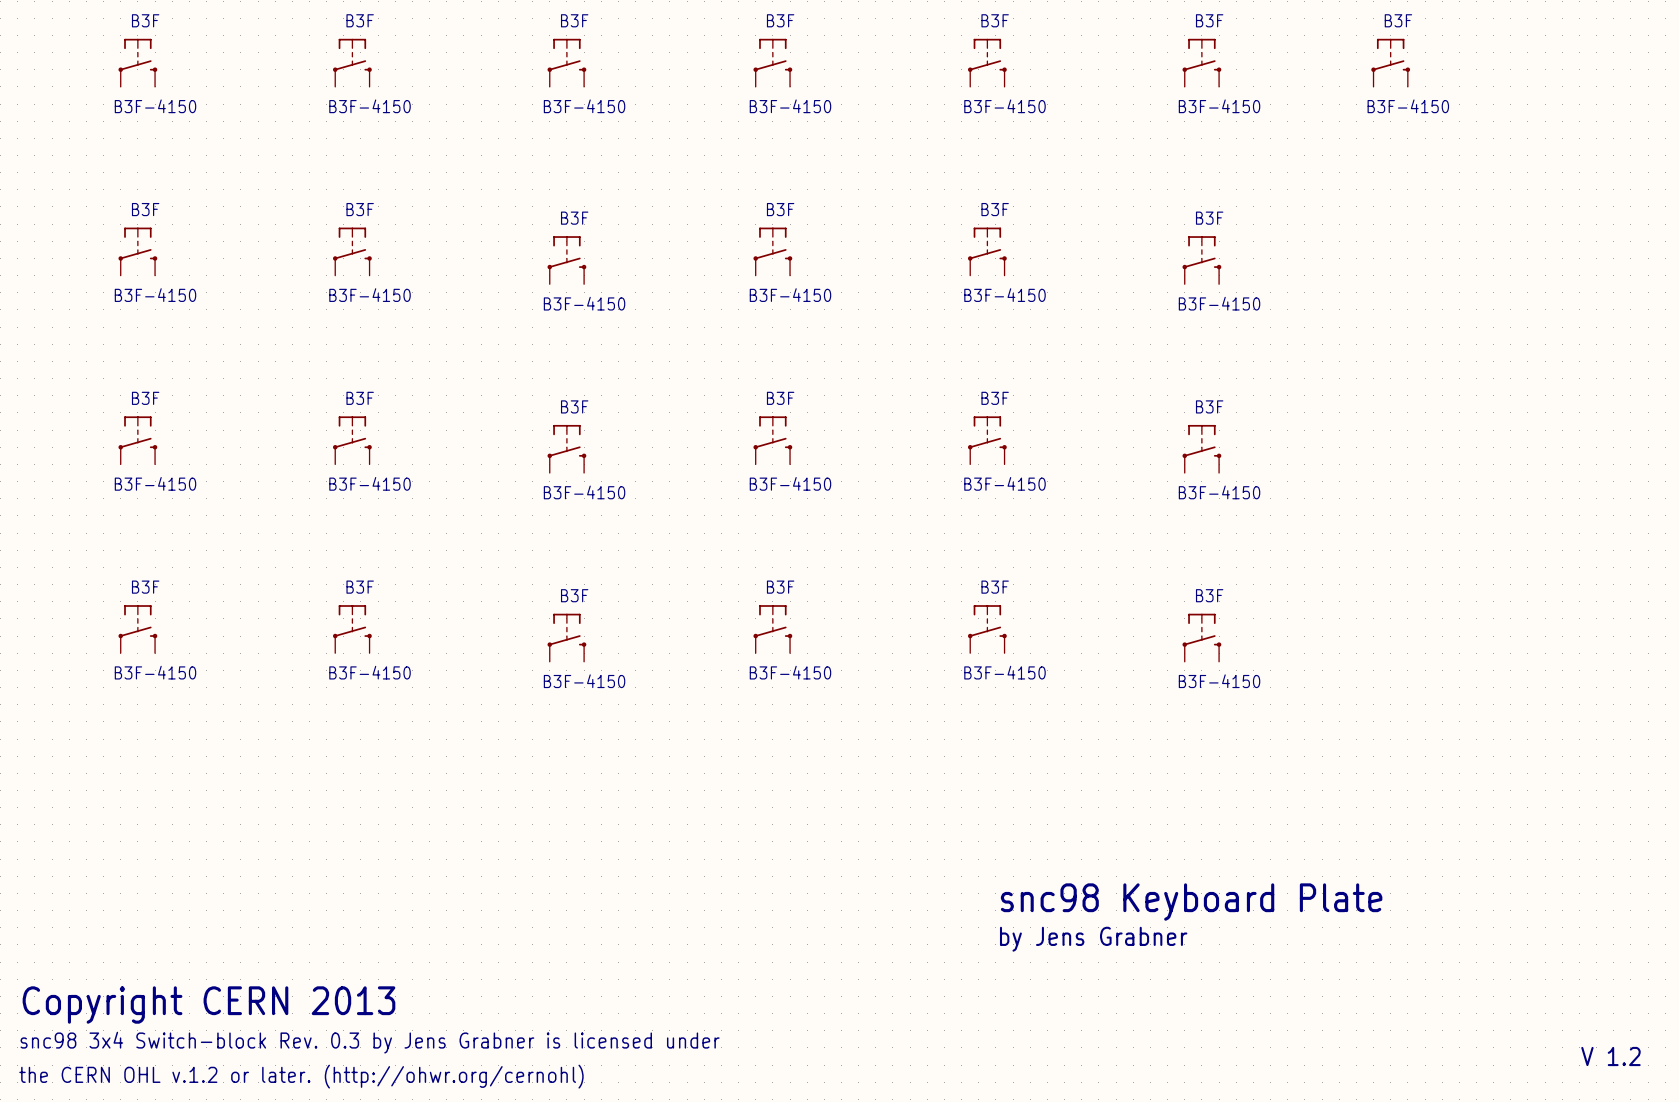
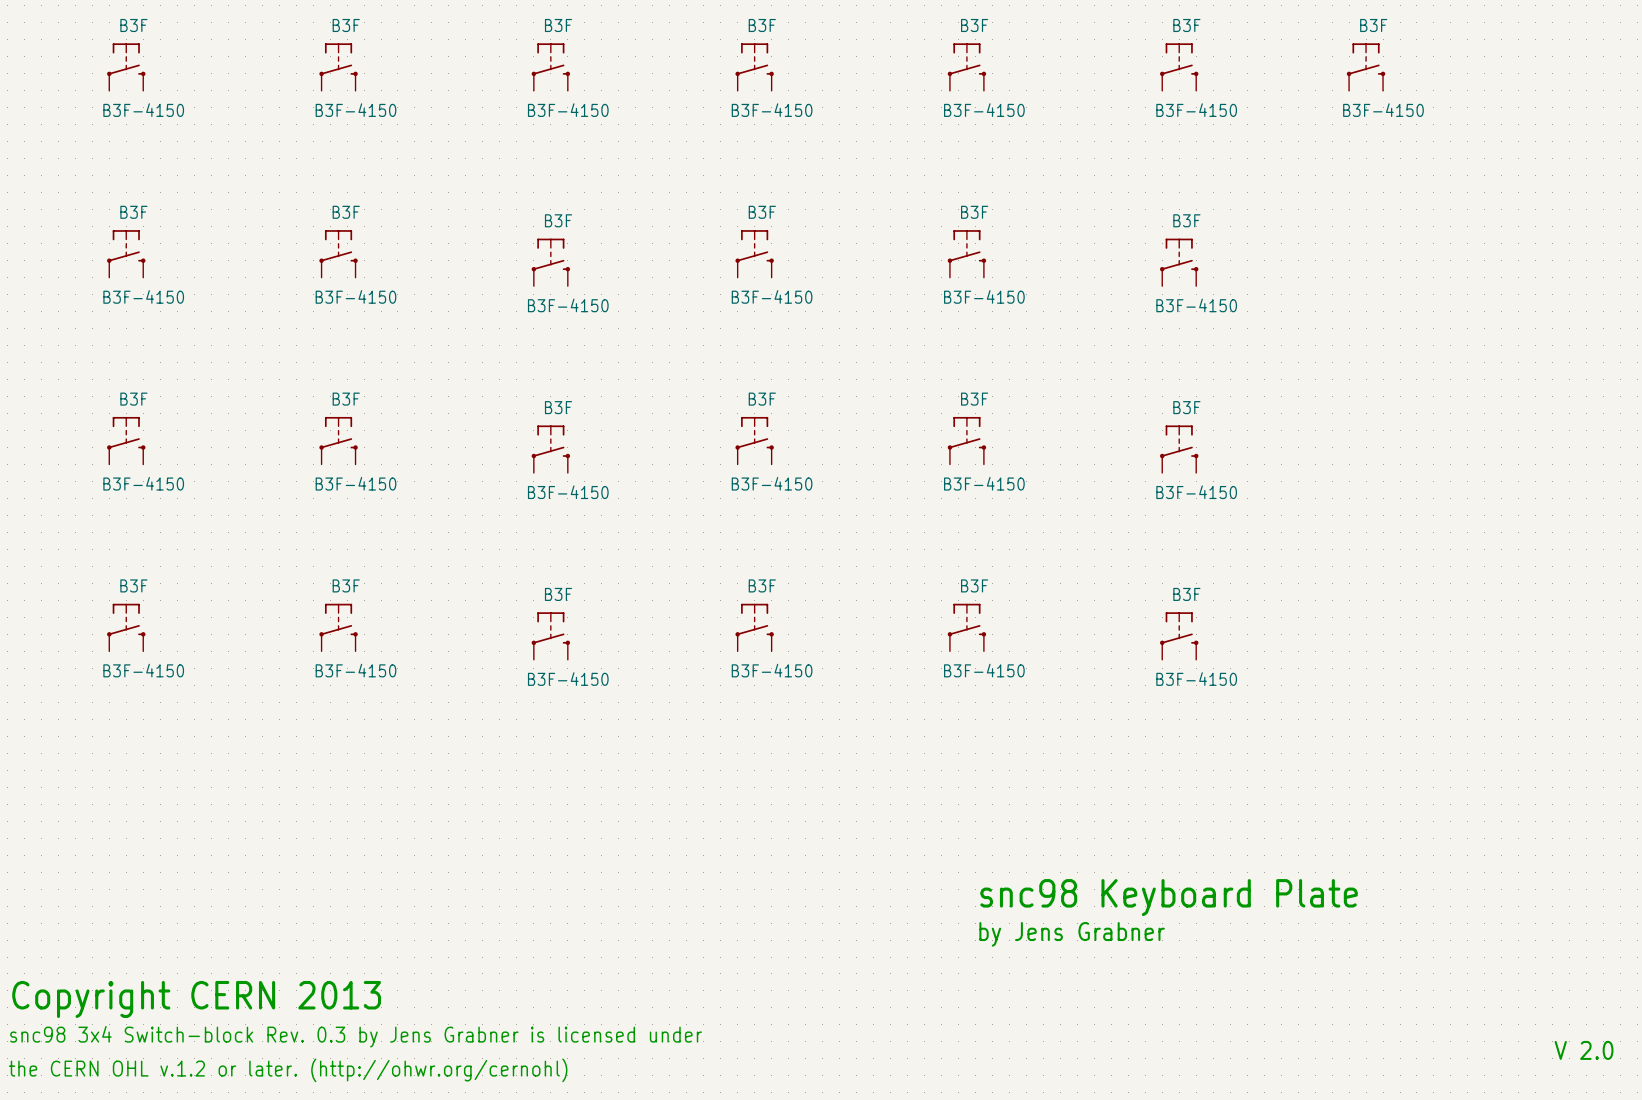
text: V 1.2 (1610, 1056) -> V 2.0 (1584, 1050)

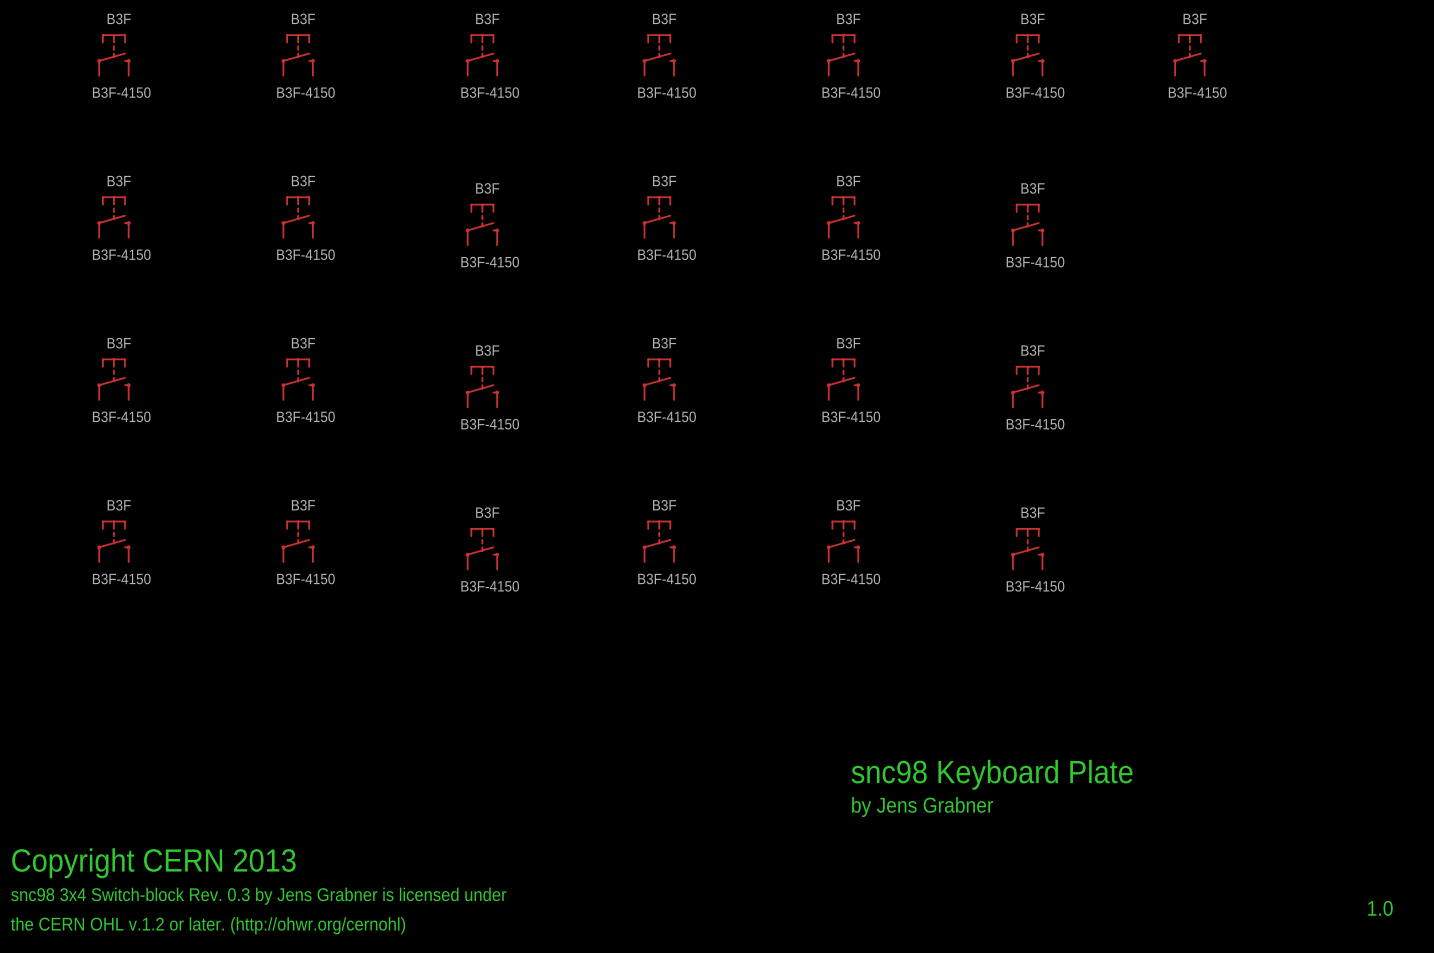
text: V 2.0 (1584, 1050) -> none
text: none -> 1.0 (1380, 908)

